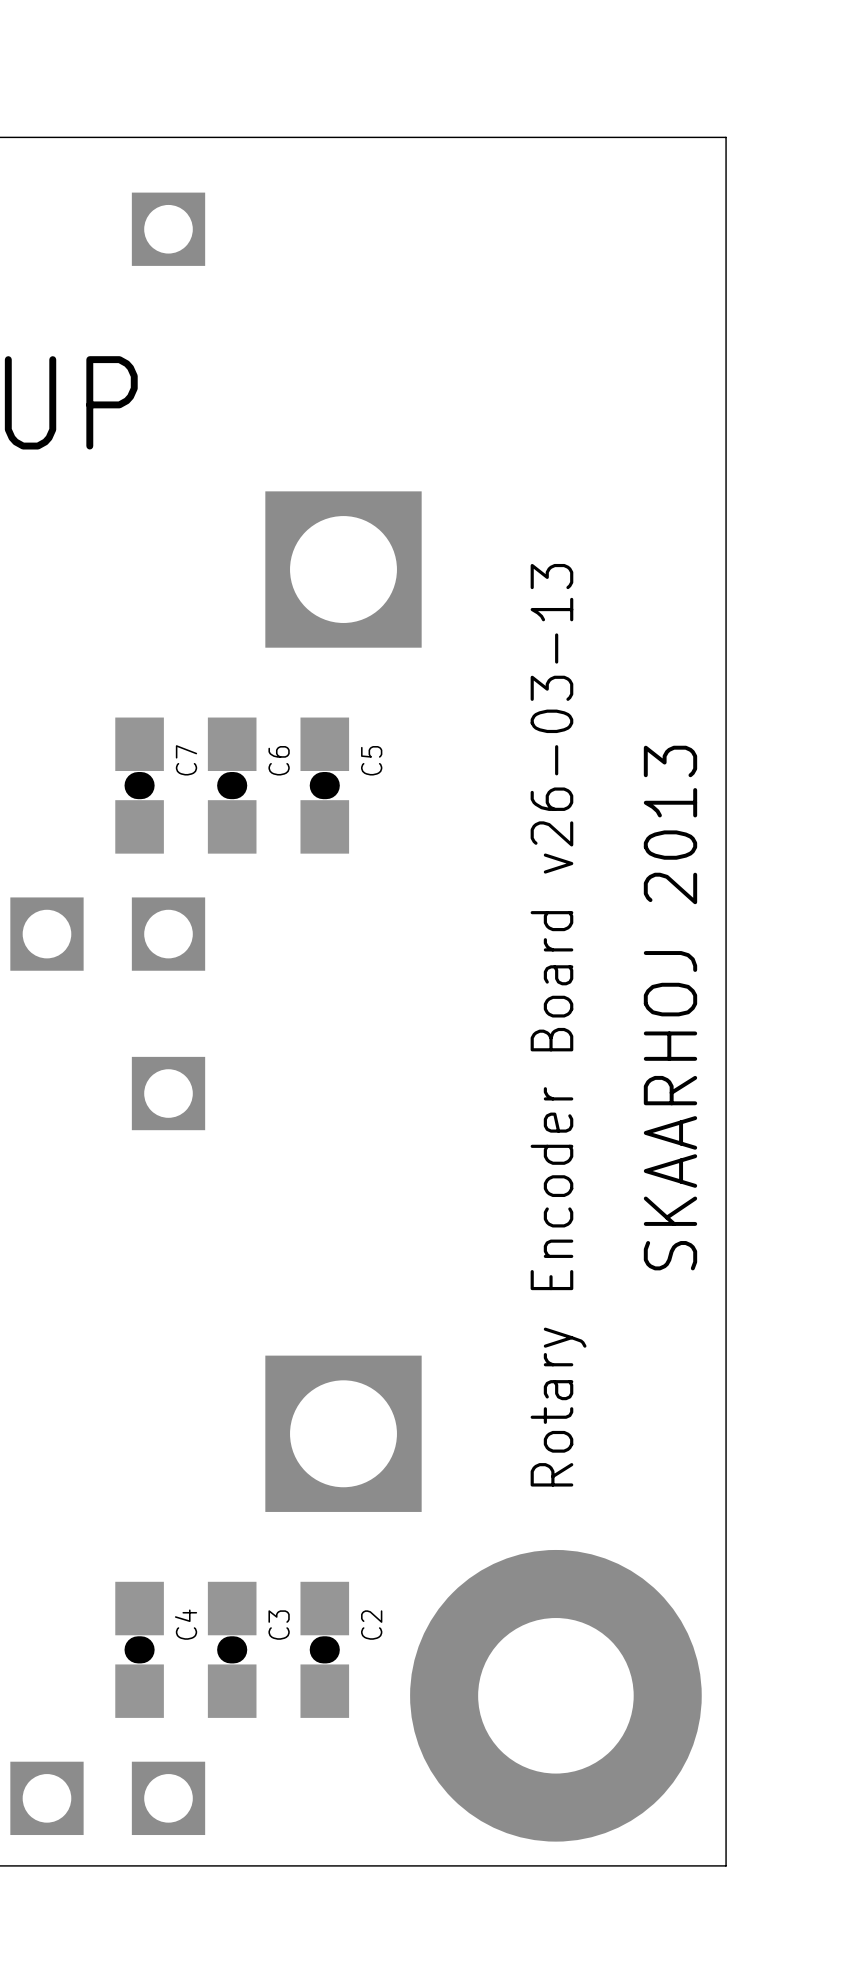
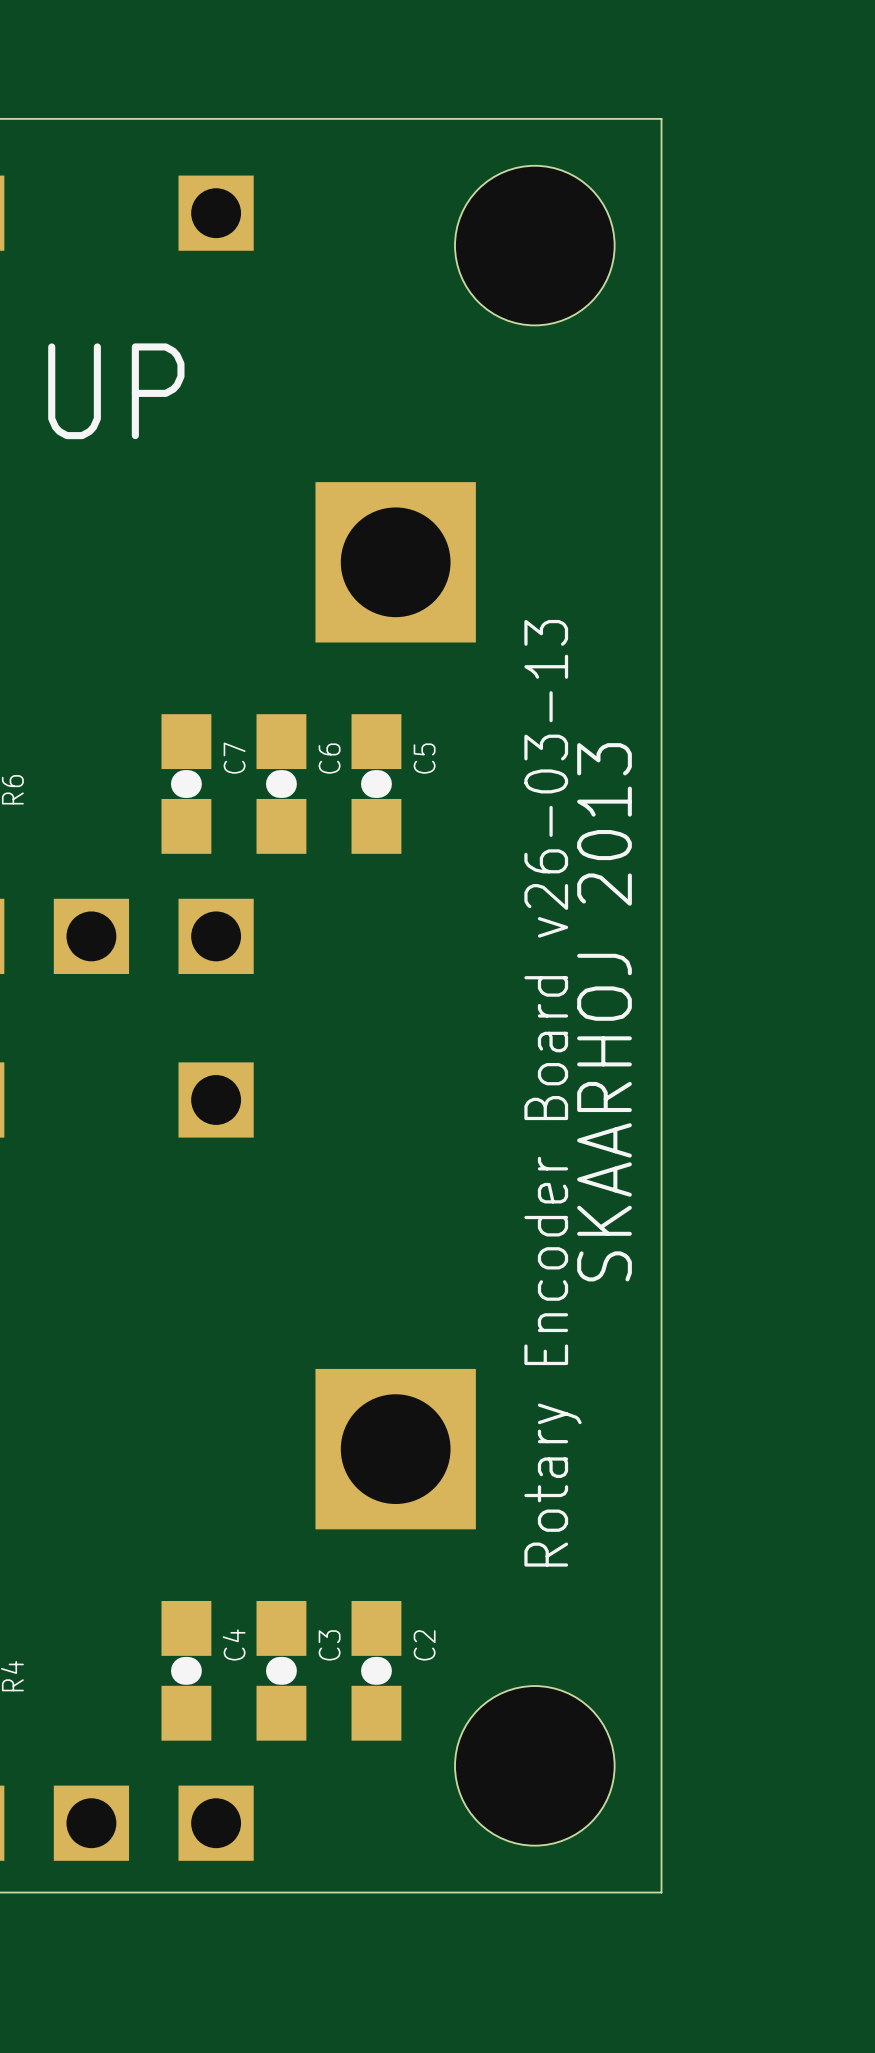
board edge: (602, 137) (726, 137) (726, 1865) (602, 1865) -> (661, 118) (661, 1892)
hole: none -> (534, 245)
text position: SKAARHOJ 2013 (670, 1008) -> SKAARHOJ 2013 (604, 1012)
text position: Rotary Encoder Board v26-03-13 (558, 1025) -> Rotary Encoder Board v26-03-13 (552, 1093)
part: (555, 1695) -> none
hole: none -> (534, 1765)

